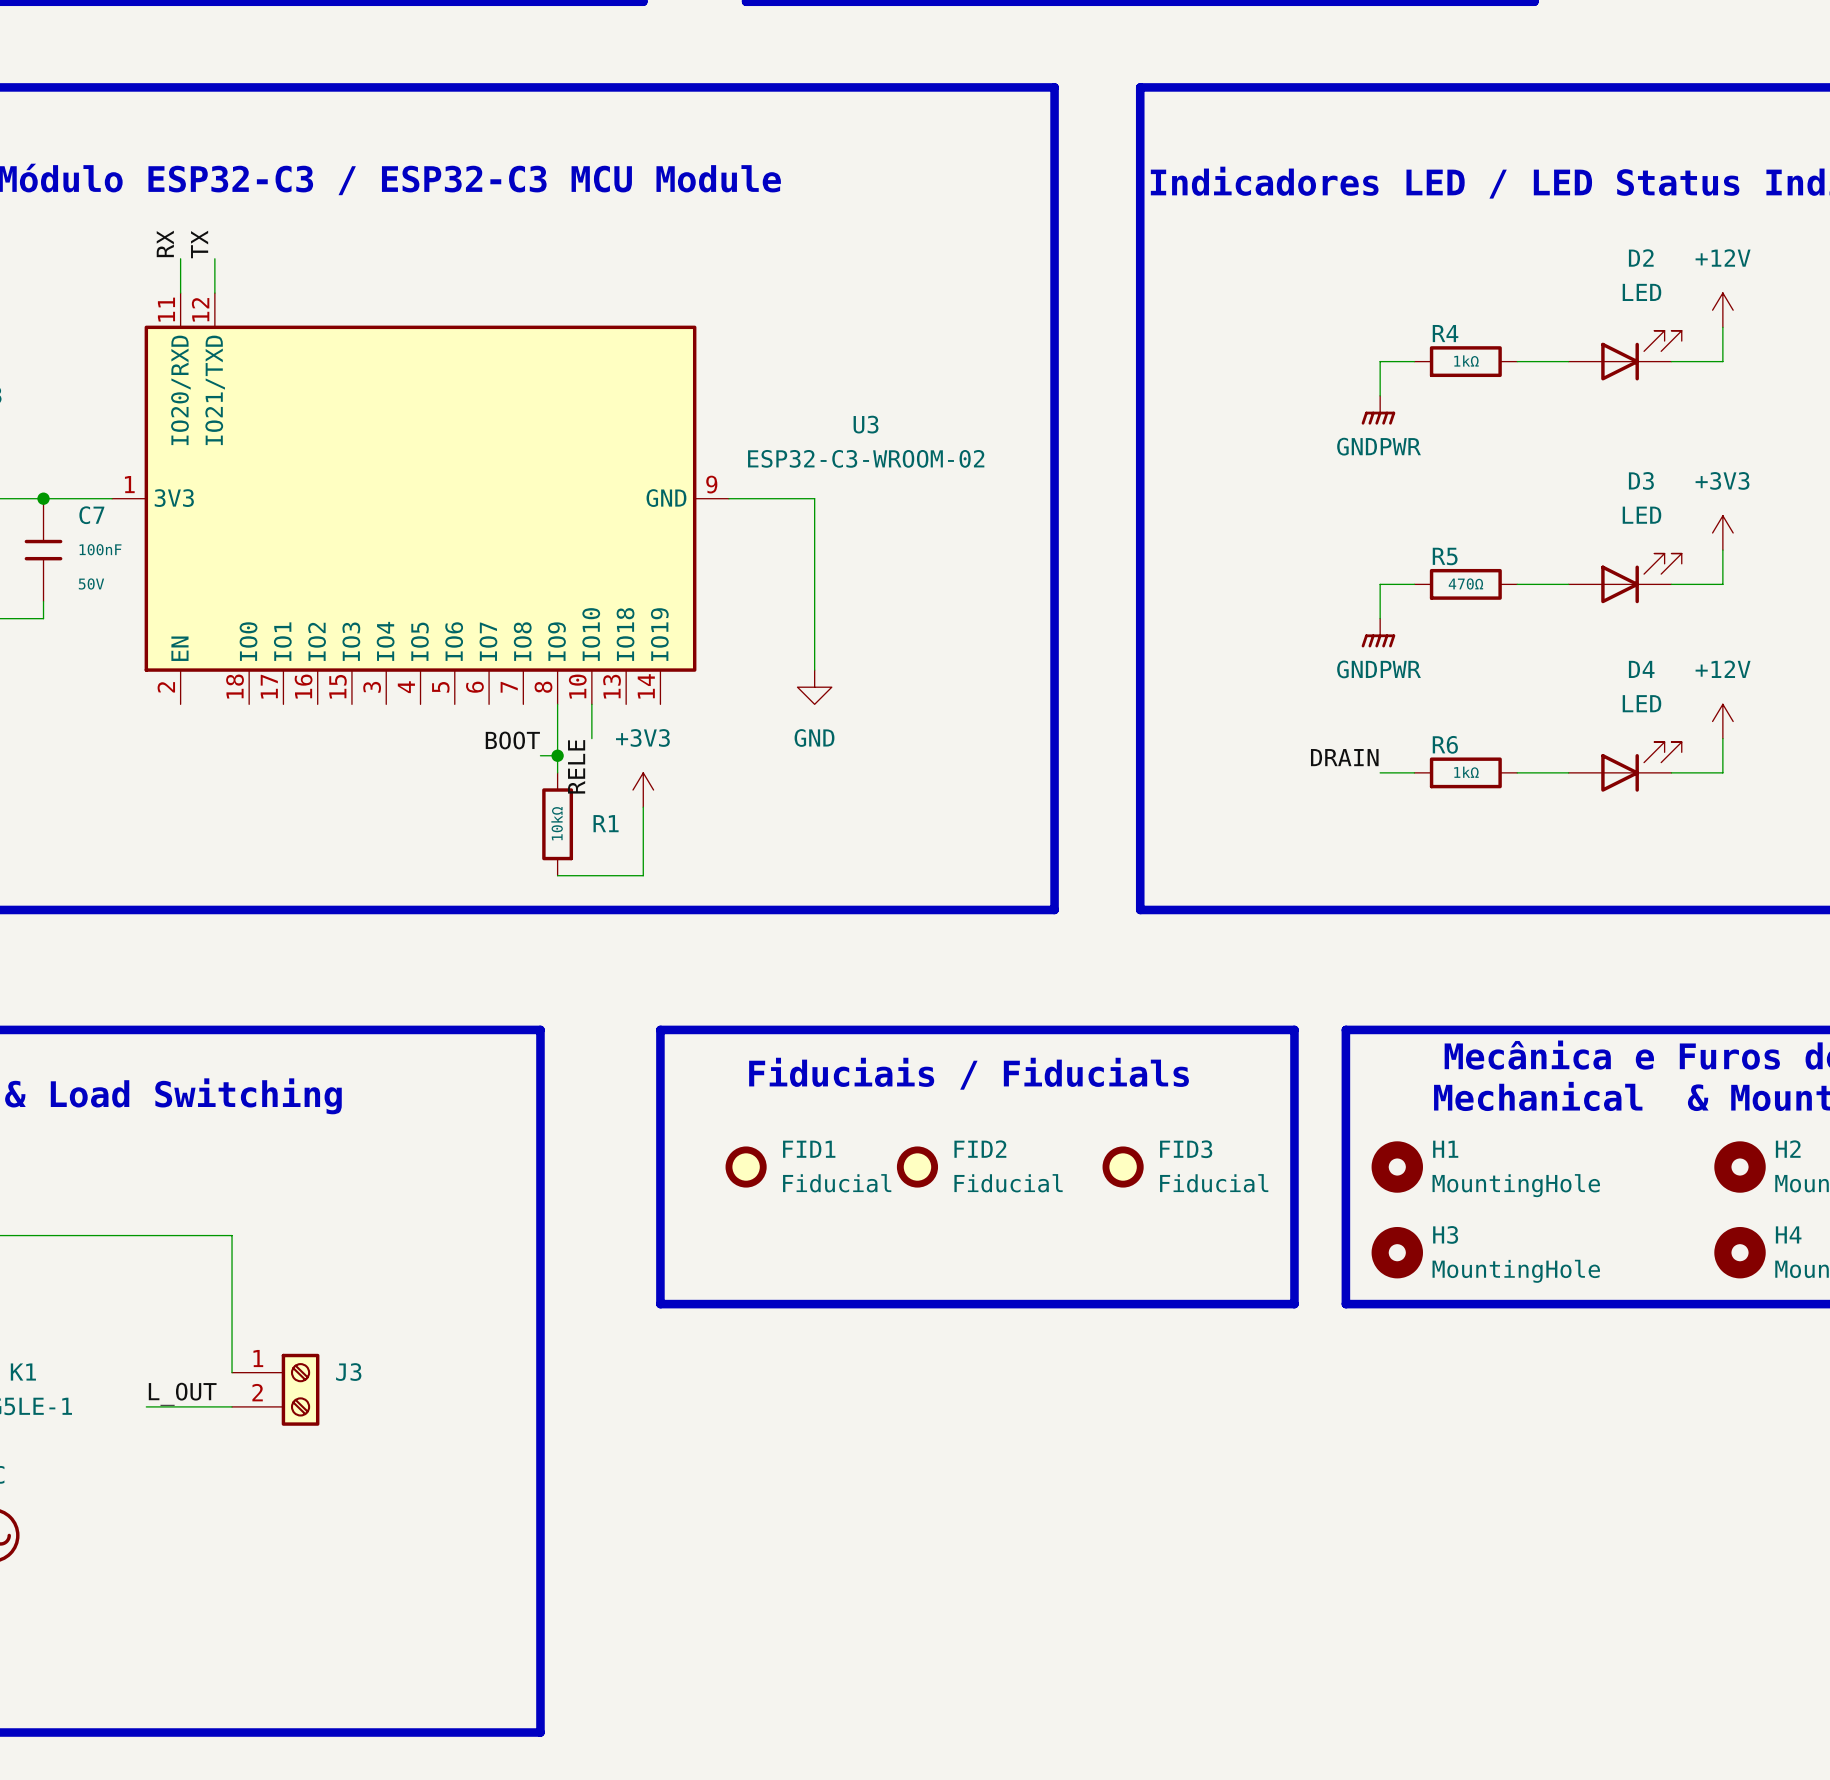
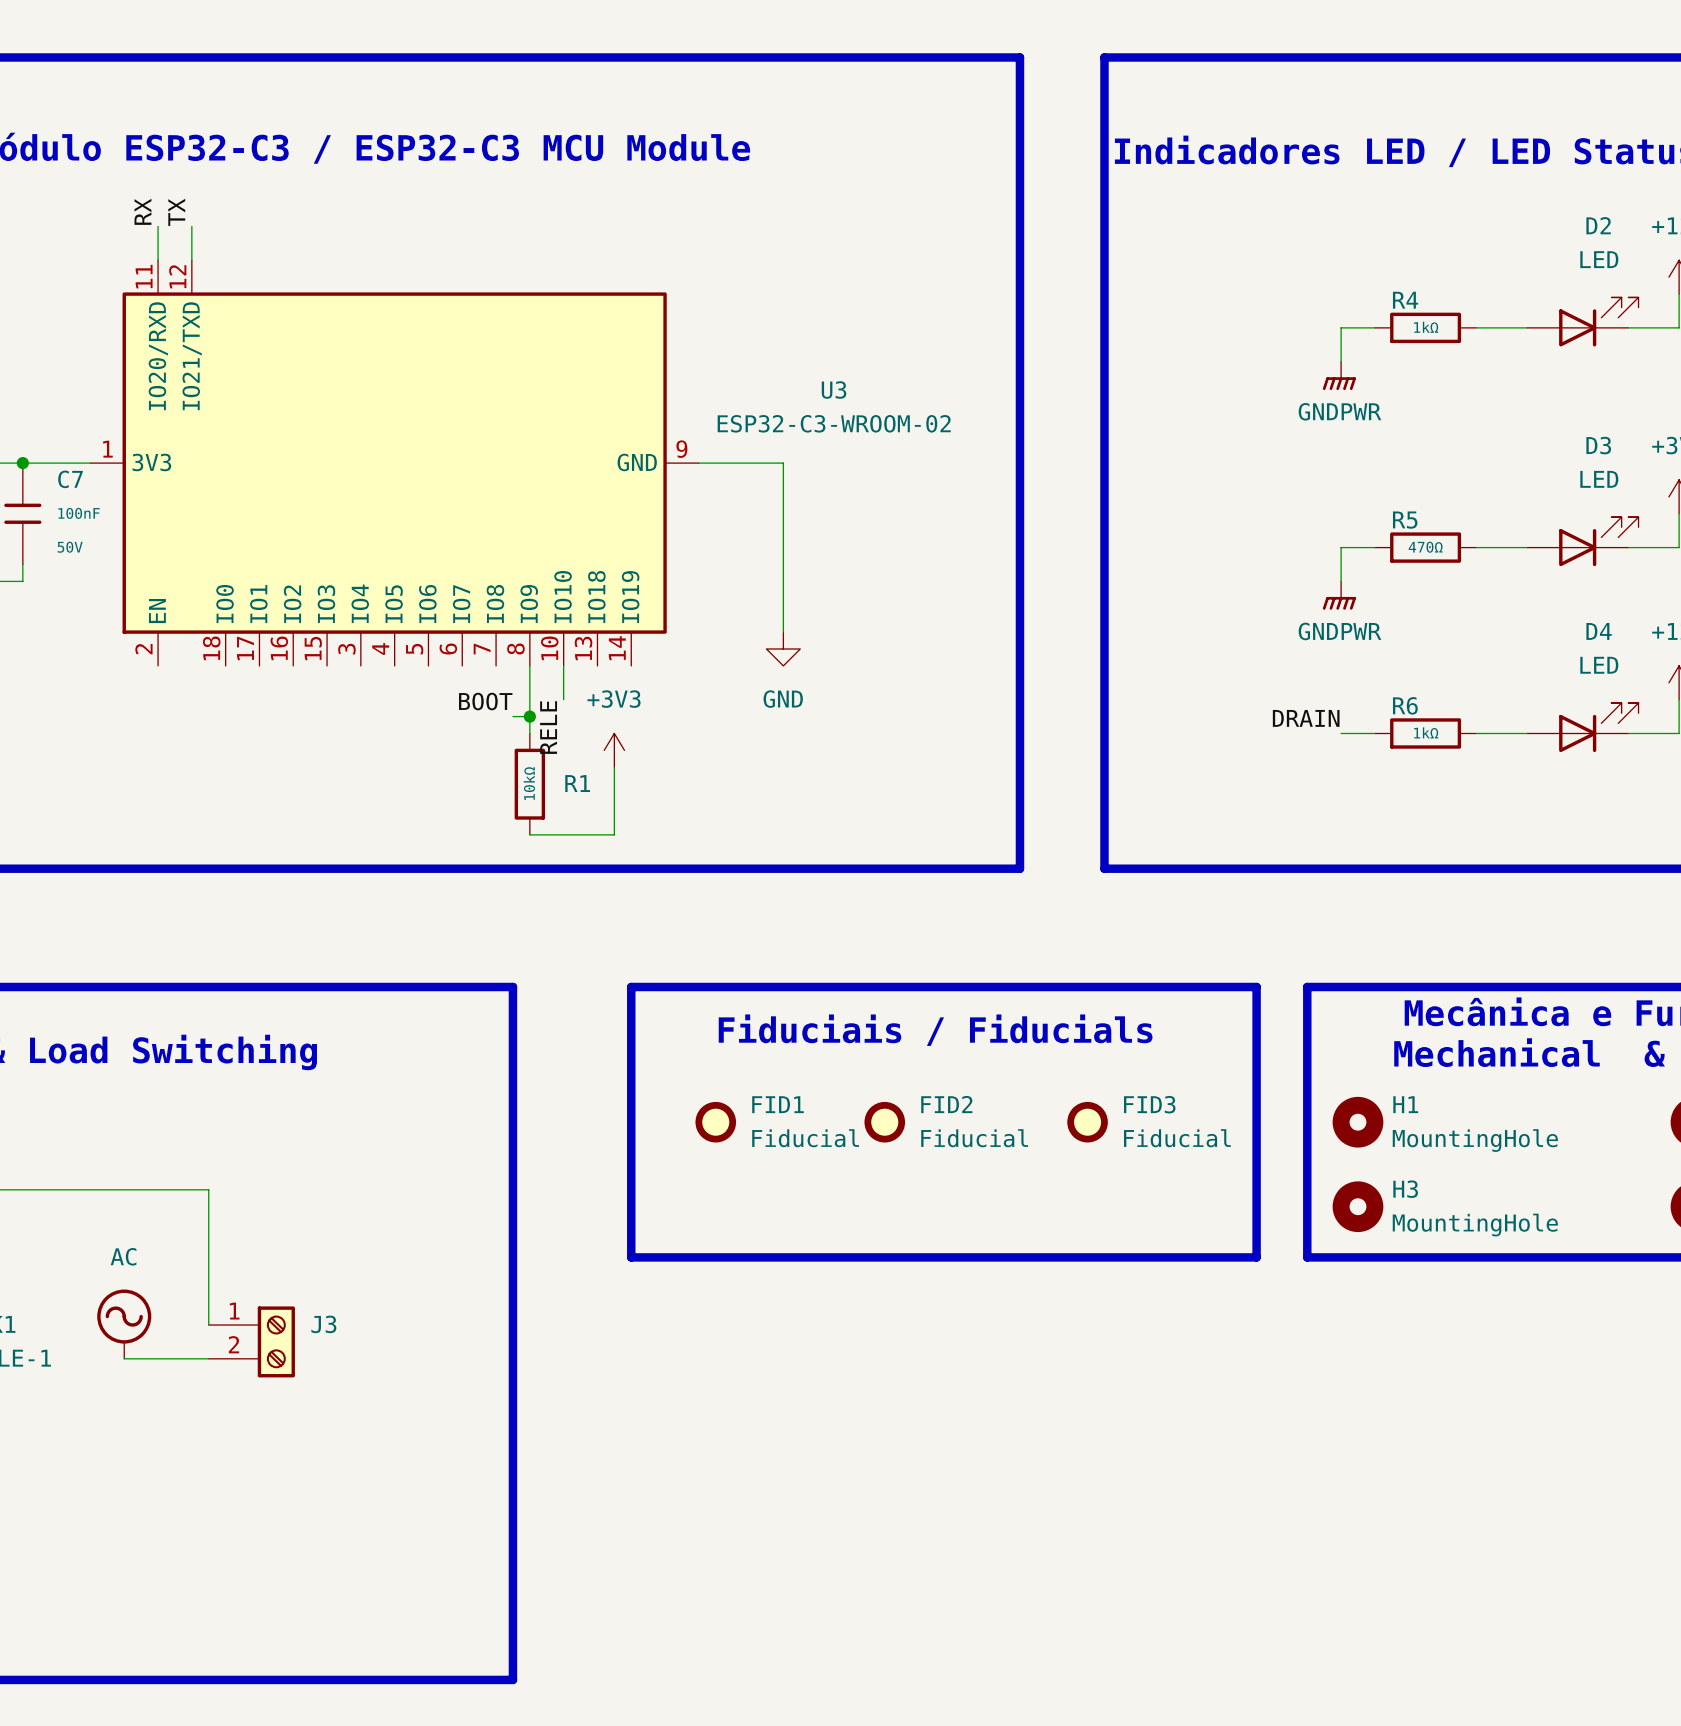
power symbol: none -> AC (124, 1324)
label: L_OUT (182, 1394) -> none

